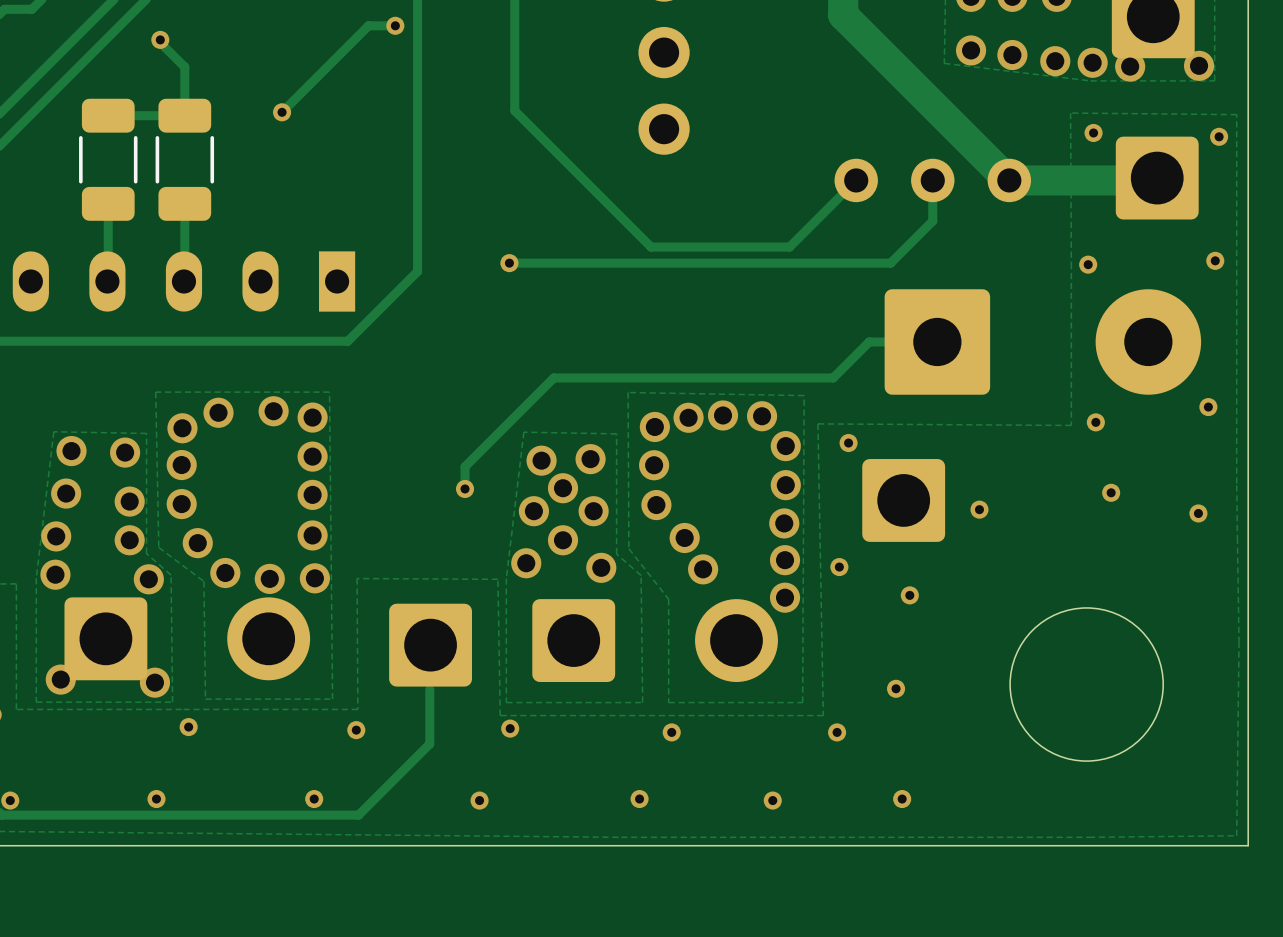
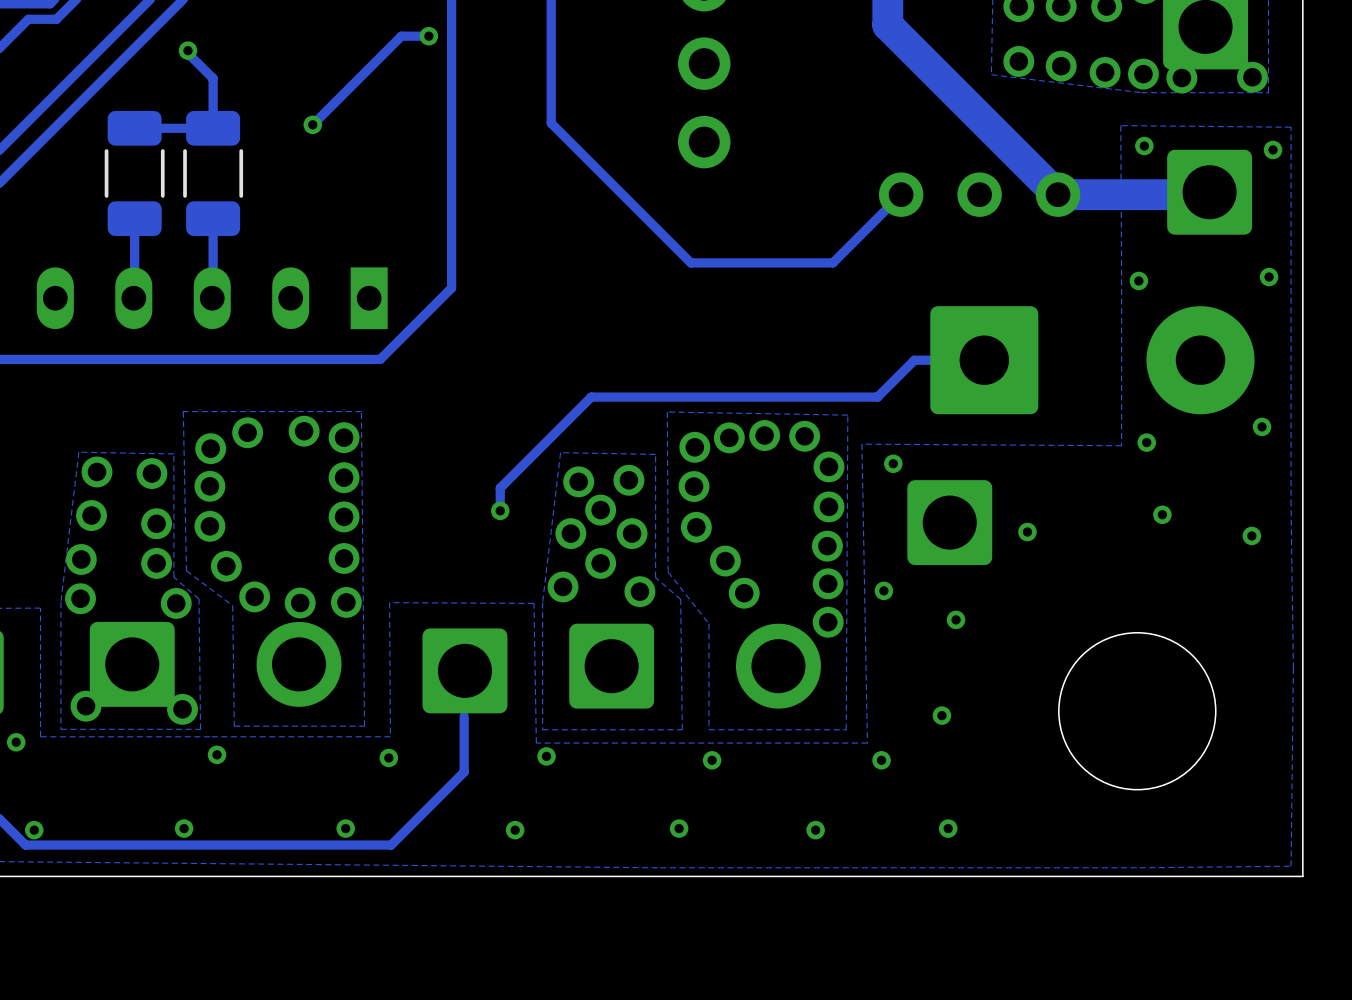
track: (932, 180) (932, 221) (890, 263) (509, 263) -> none
via: (509, 263) -> none

